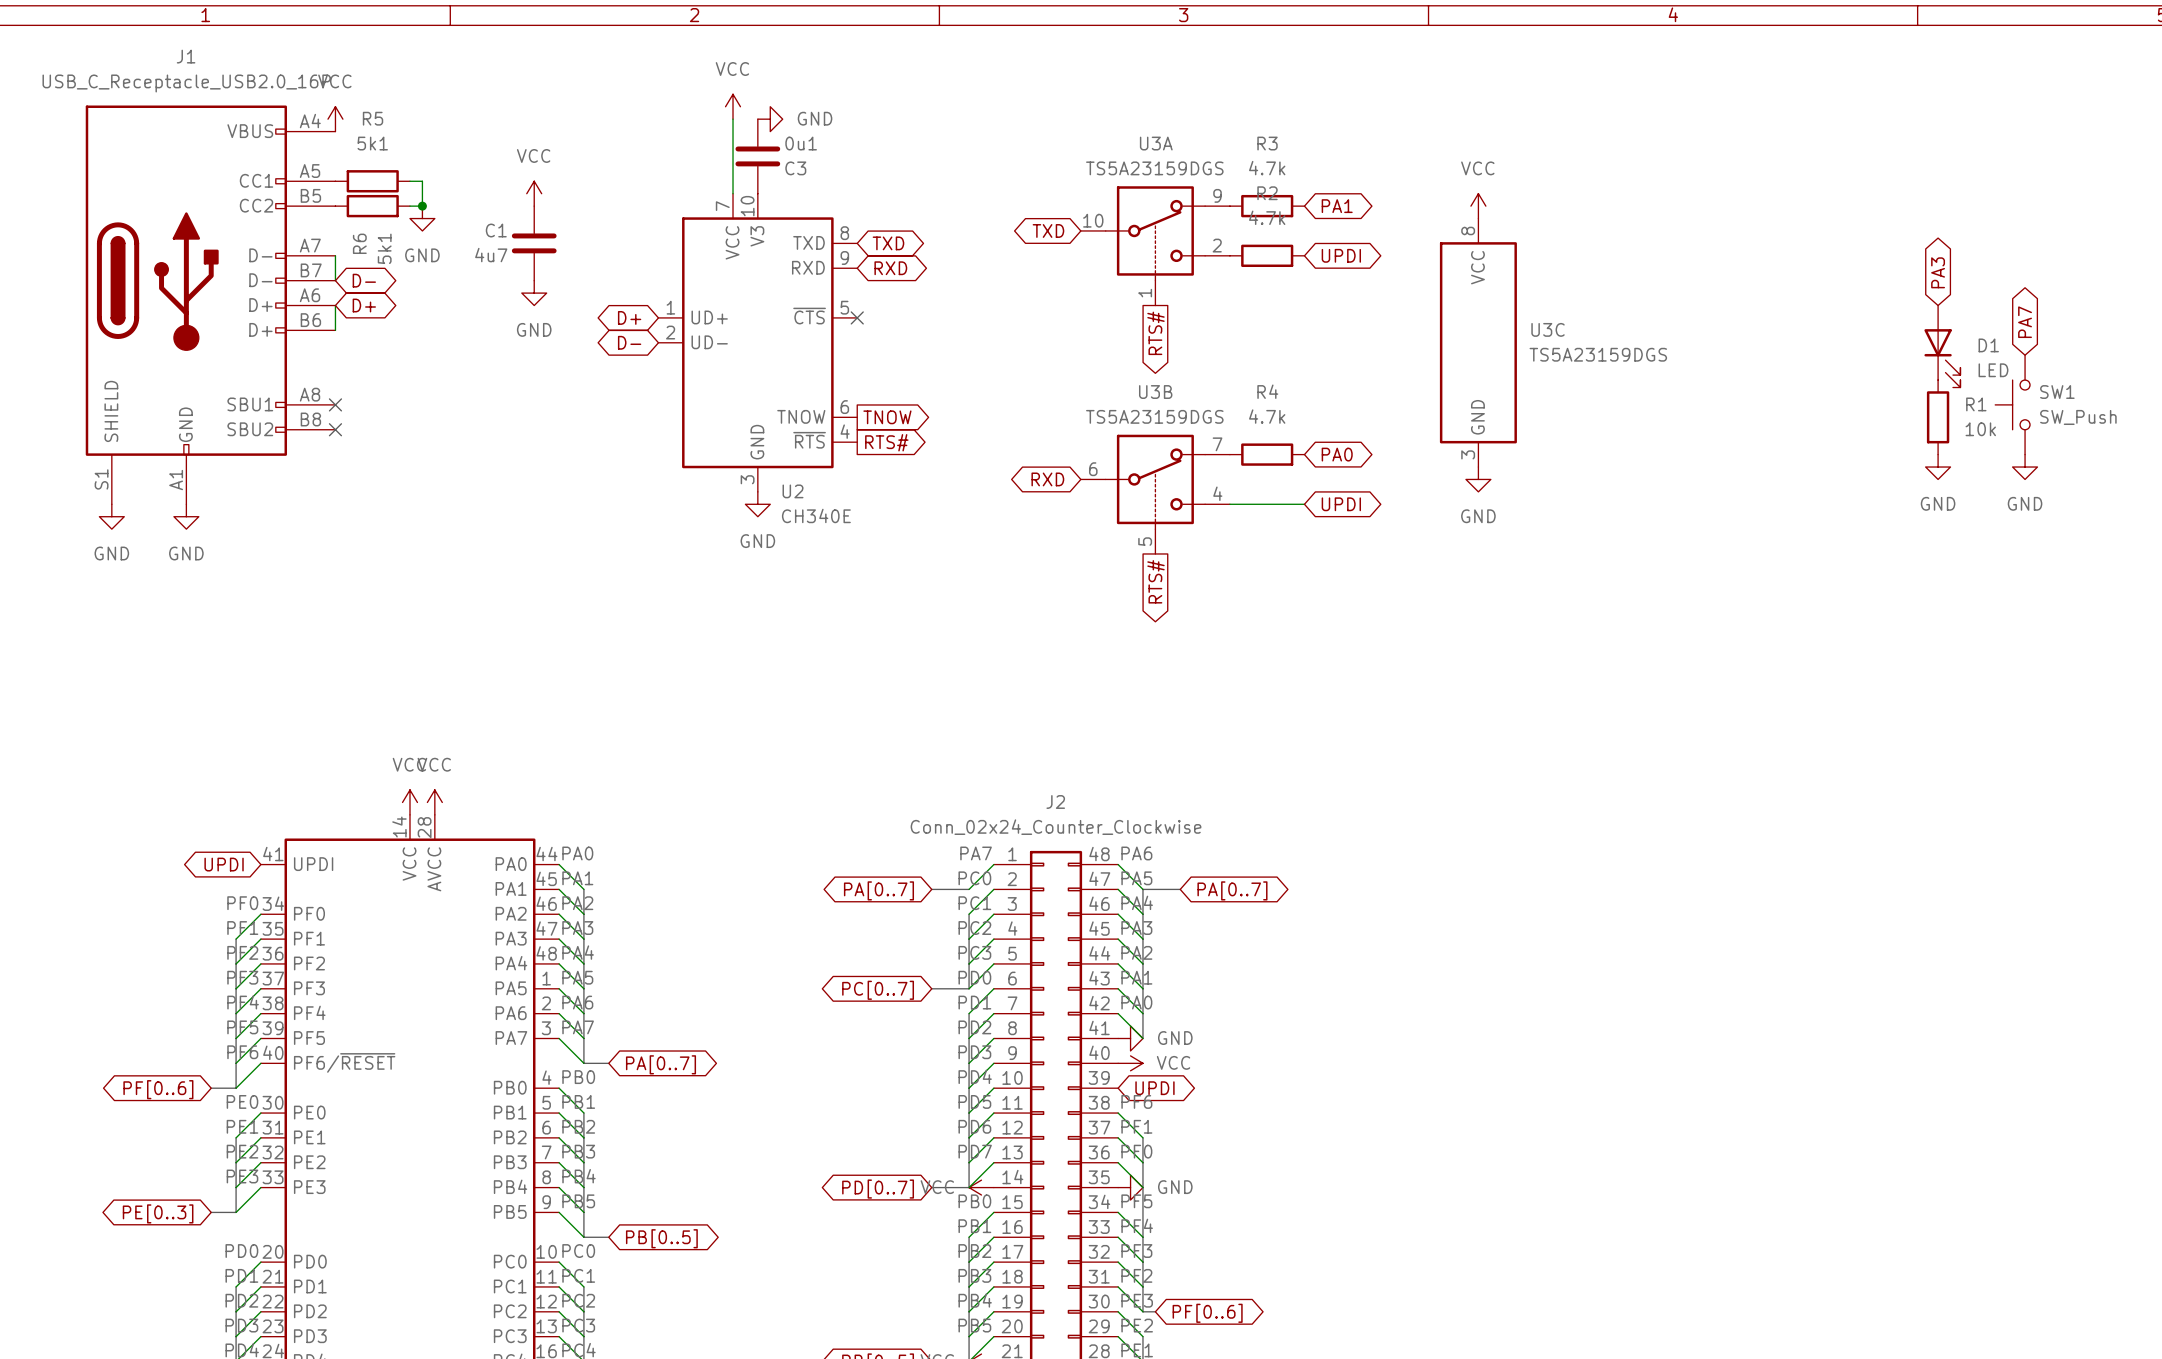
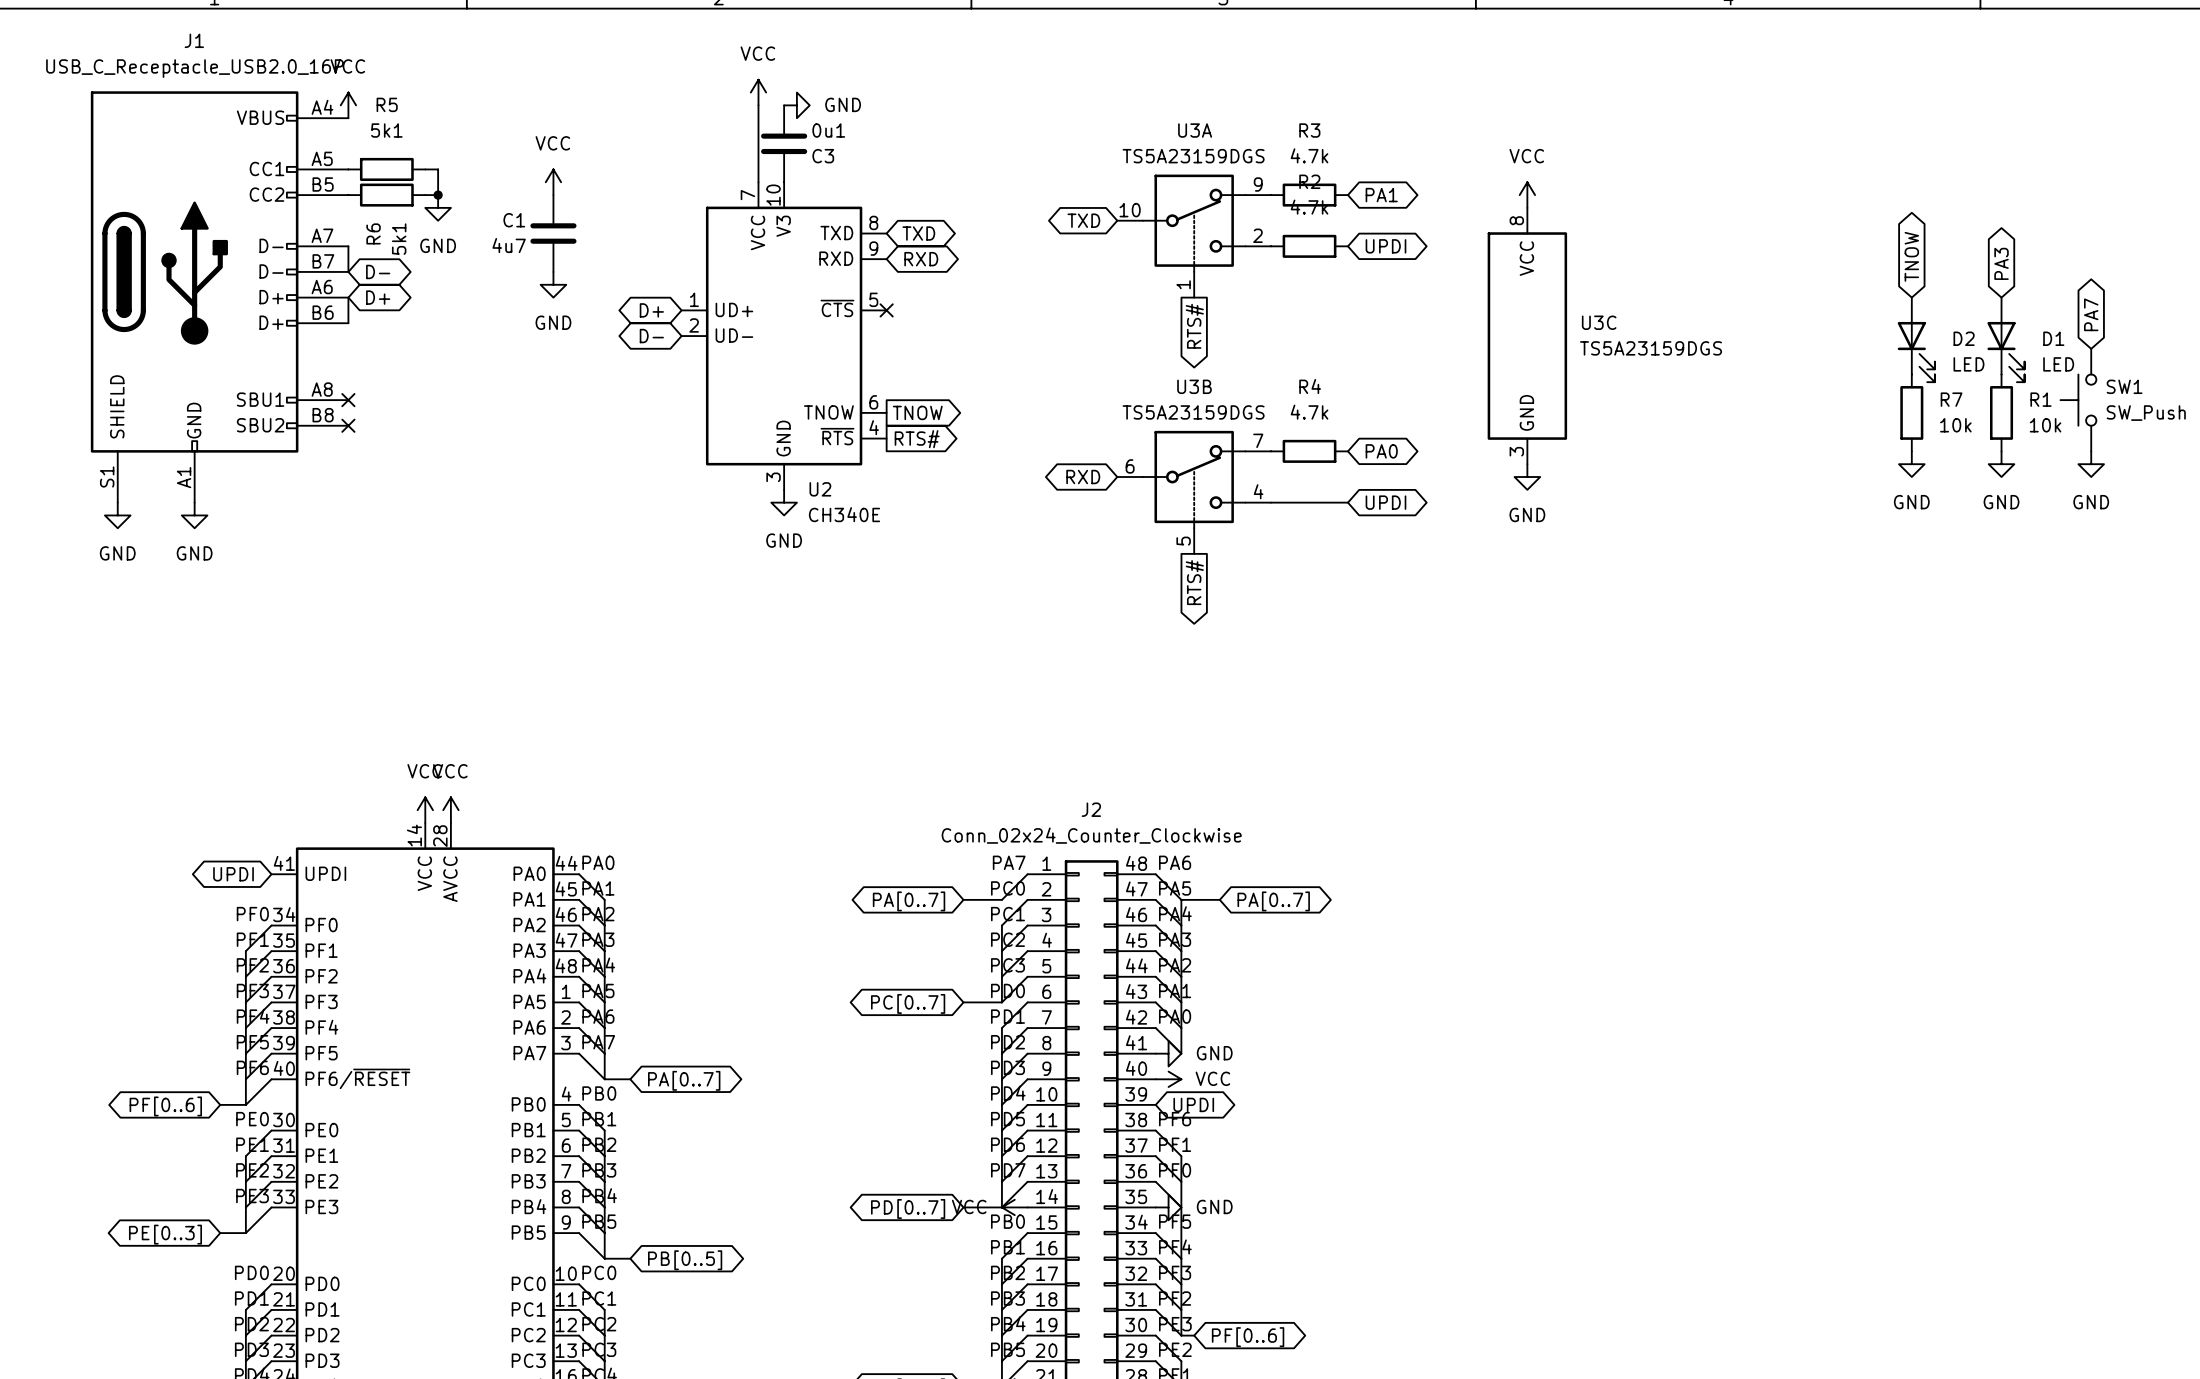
global label: none -> TNOW (1911, 256)
D2: none -> LED (1916, 339)
R7: none -> 10k (1911, 412)
power symbol: none -> GND (1911, 464)

